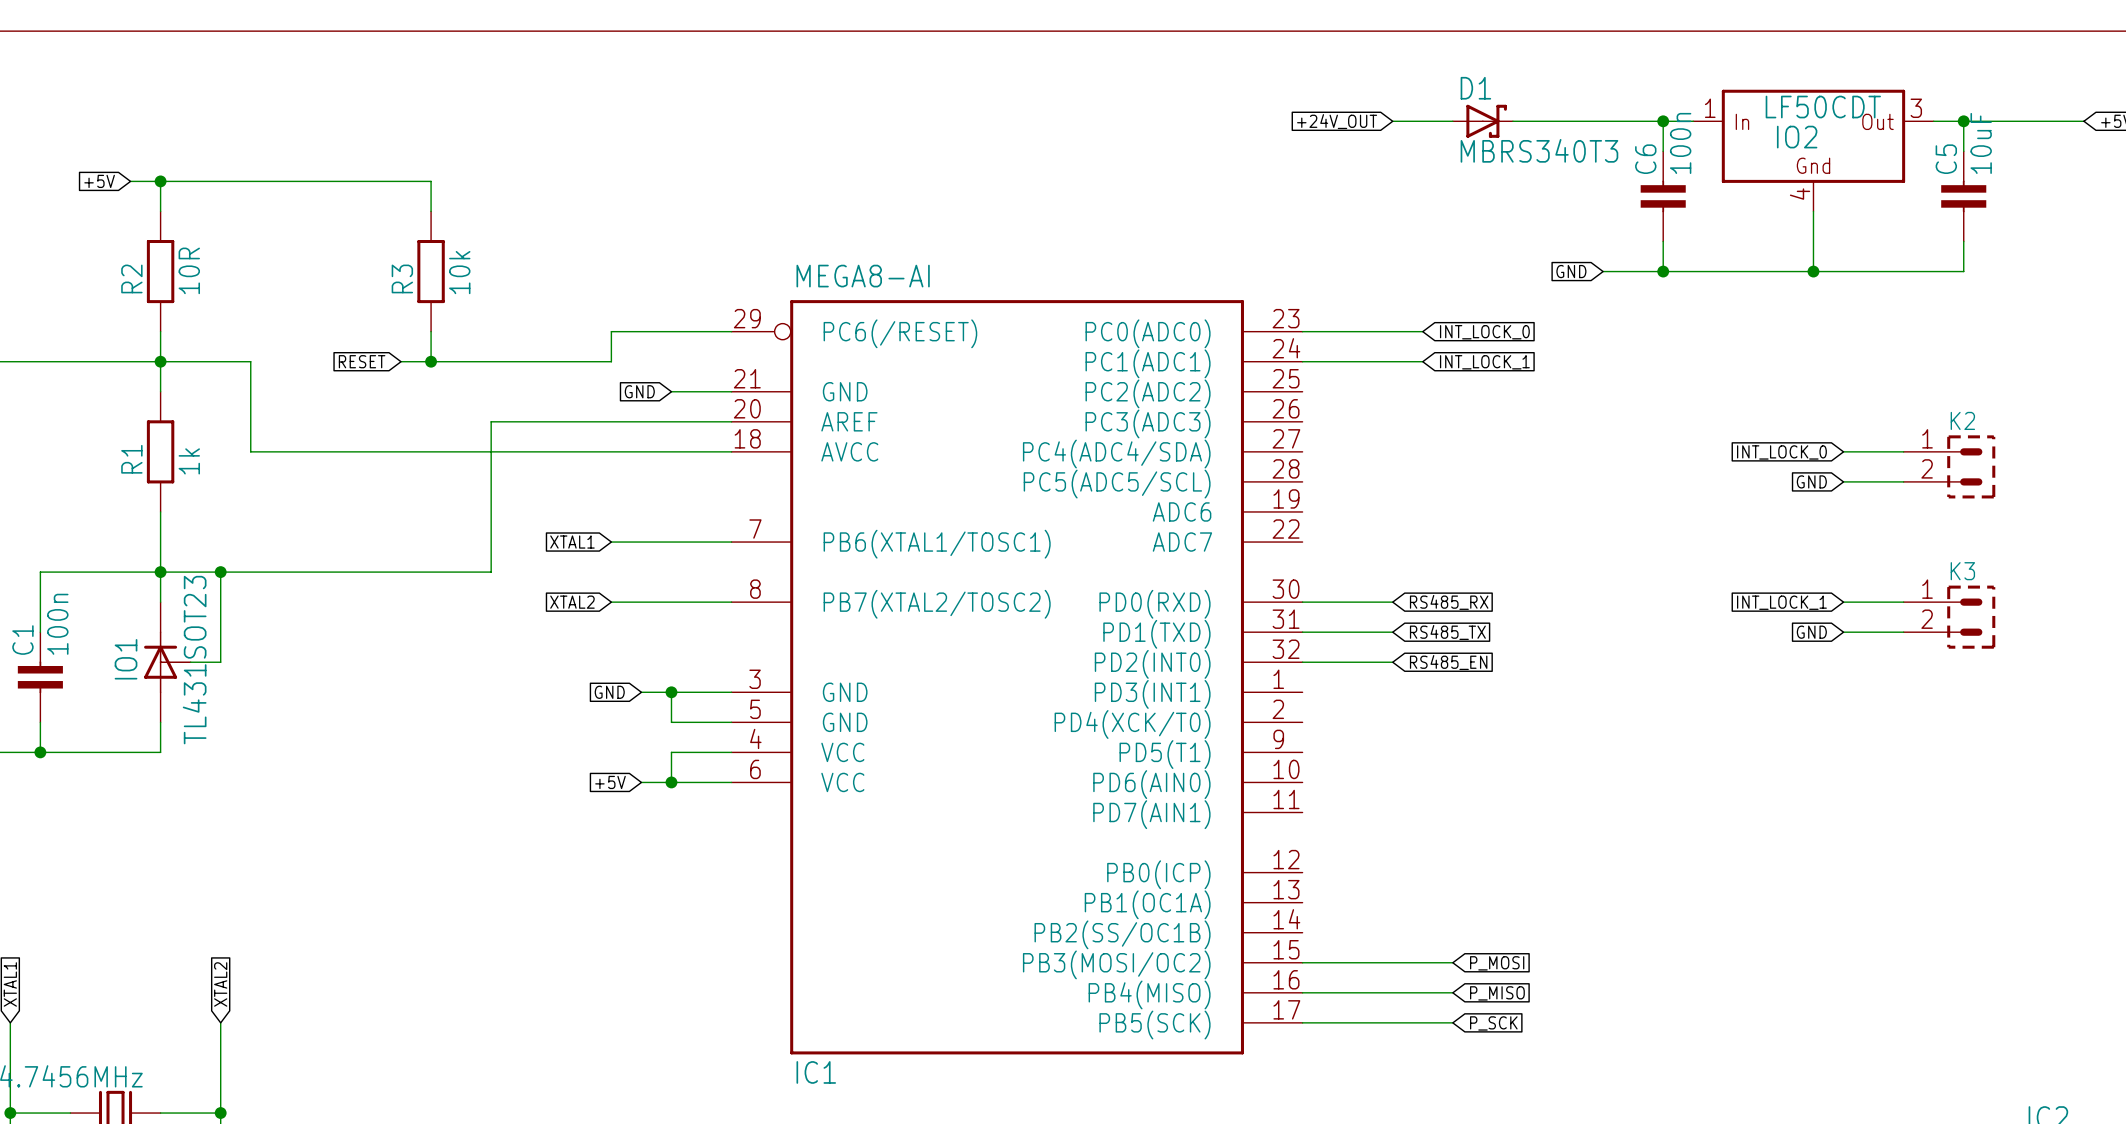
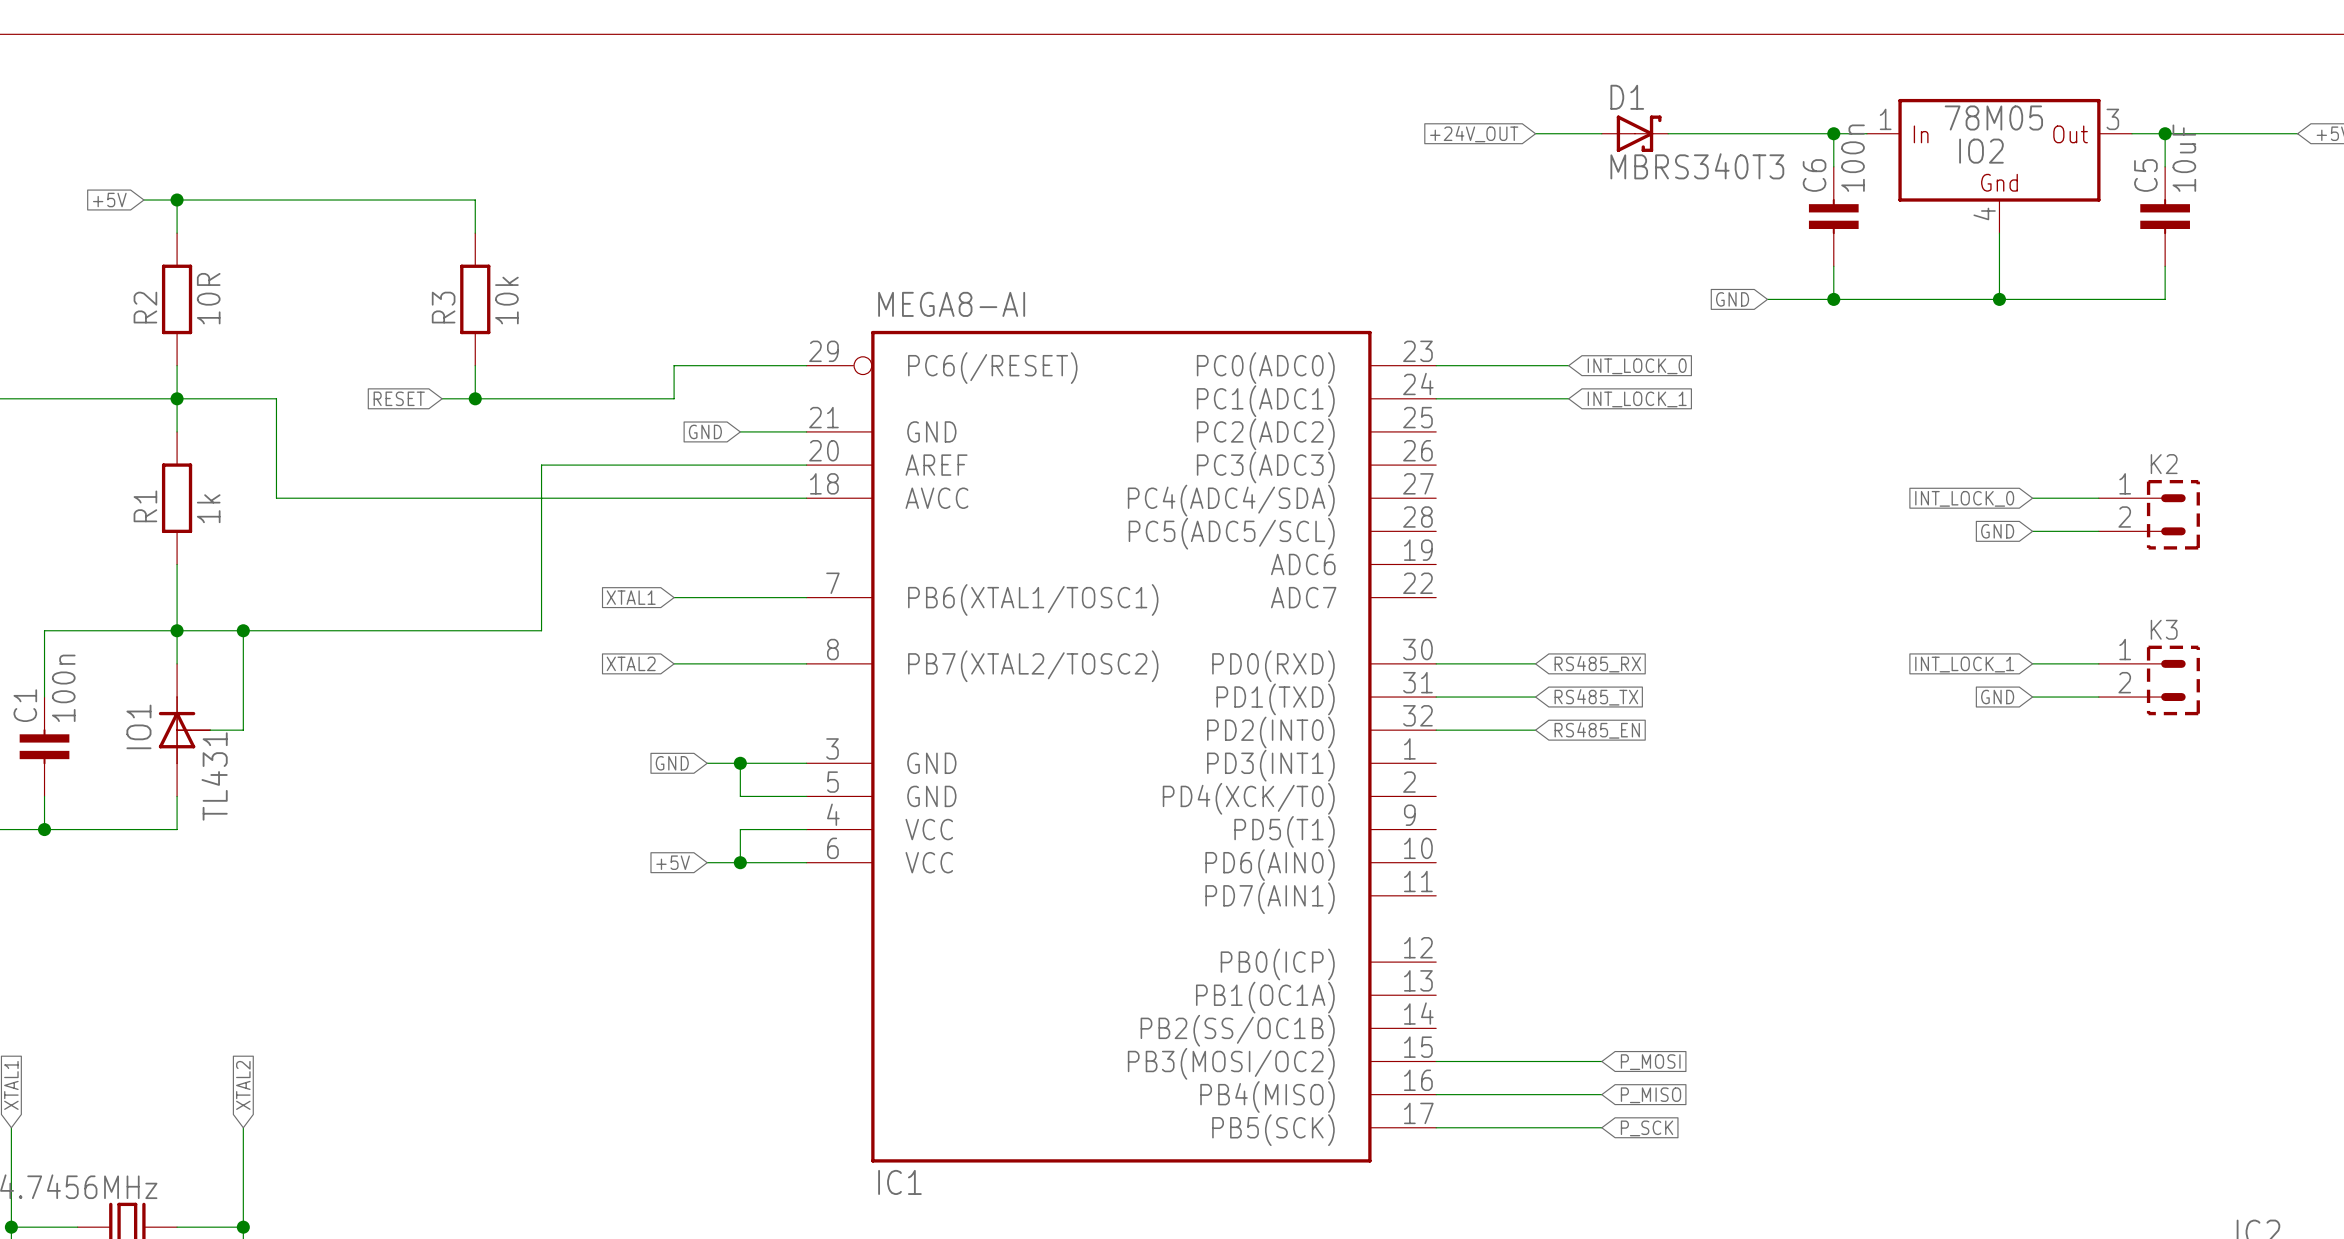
IO2 value: LF50CDT (1823, 107) -> 78M05 (1993, 117)
IO1 value: TL431SOT23 (194, 660) -> TL431 (214, 776)

